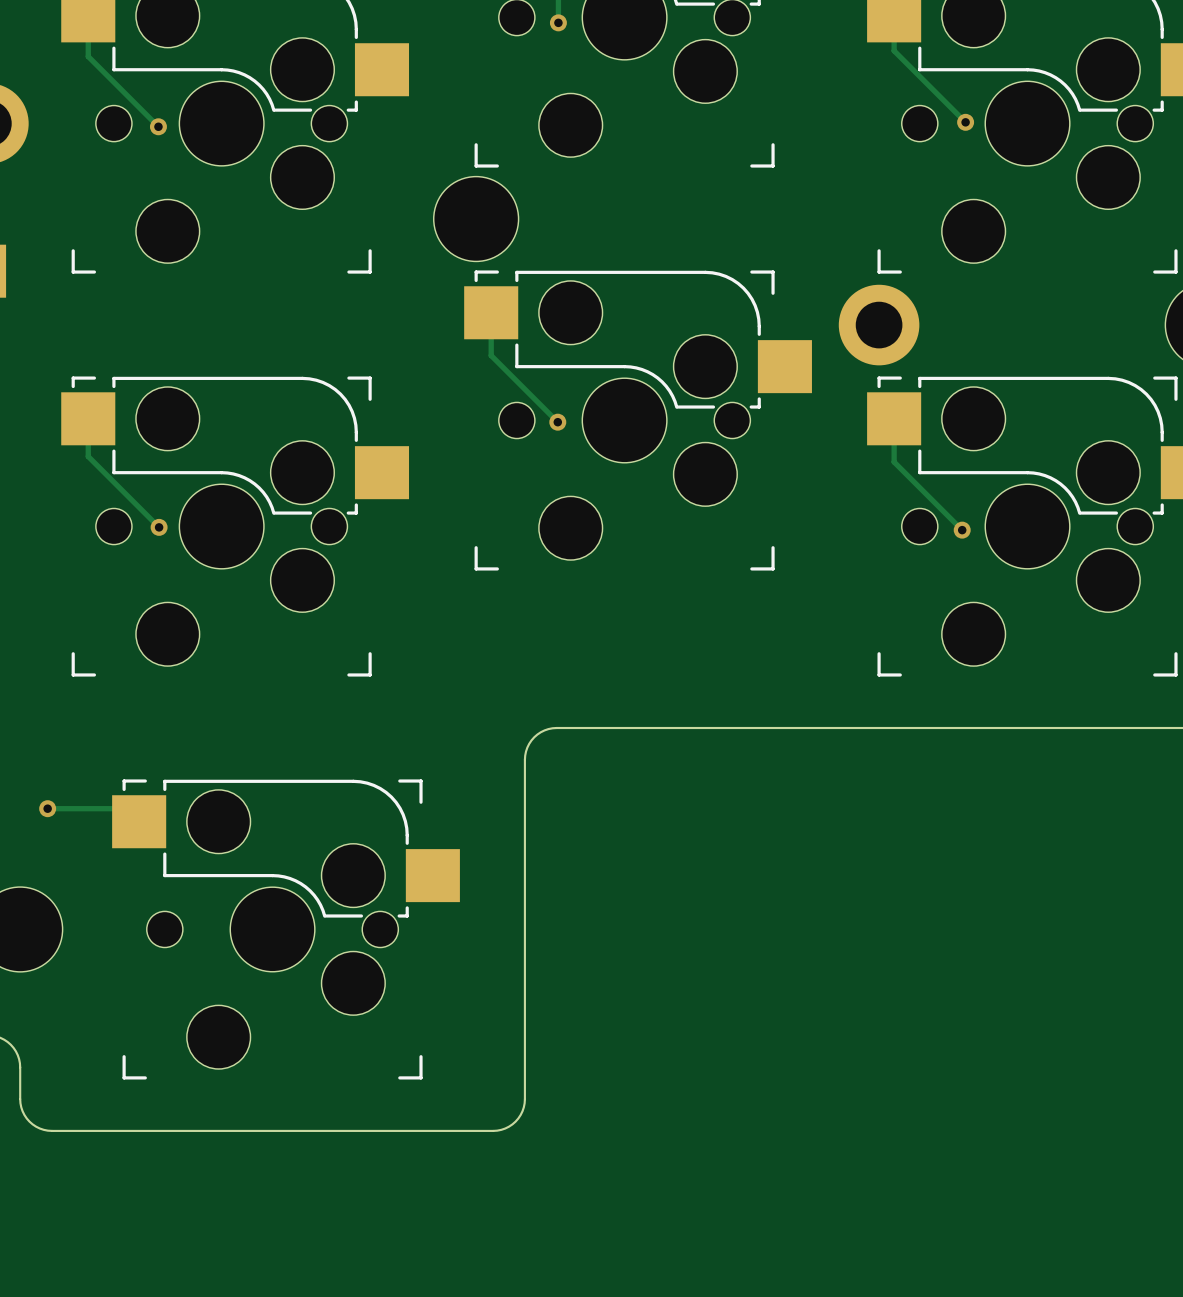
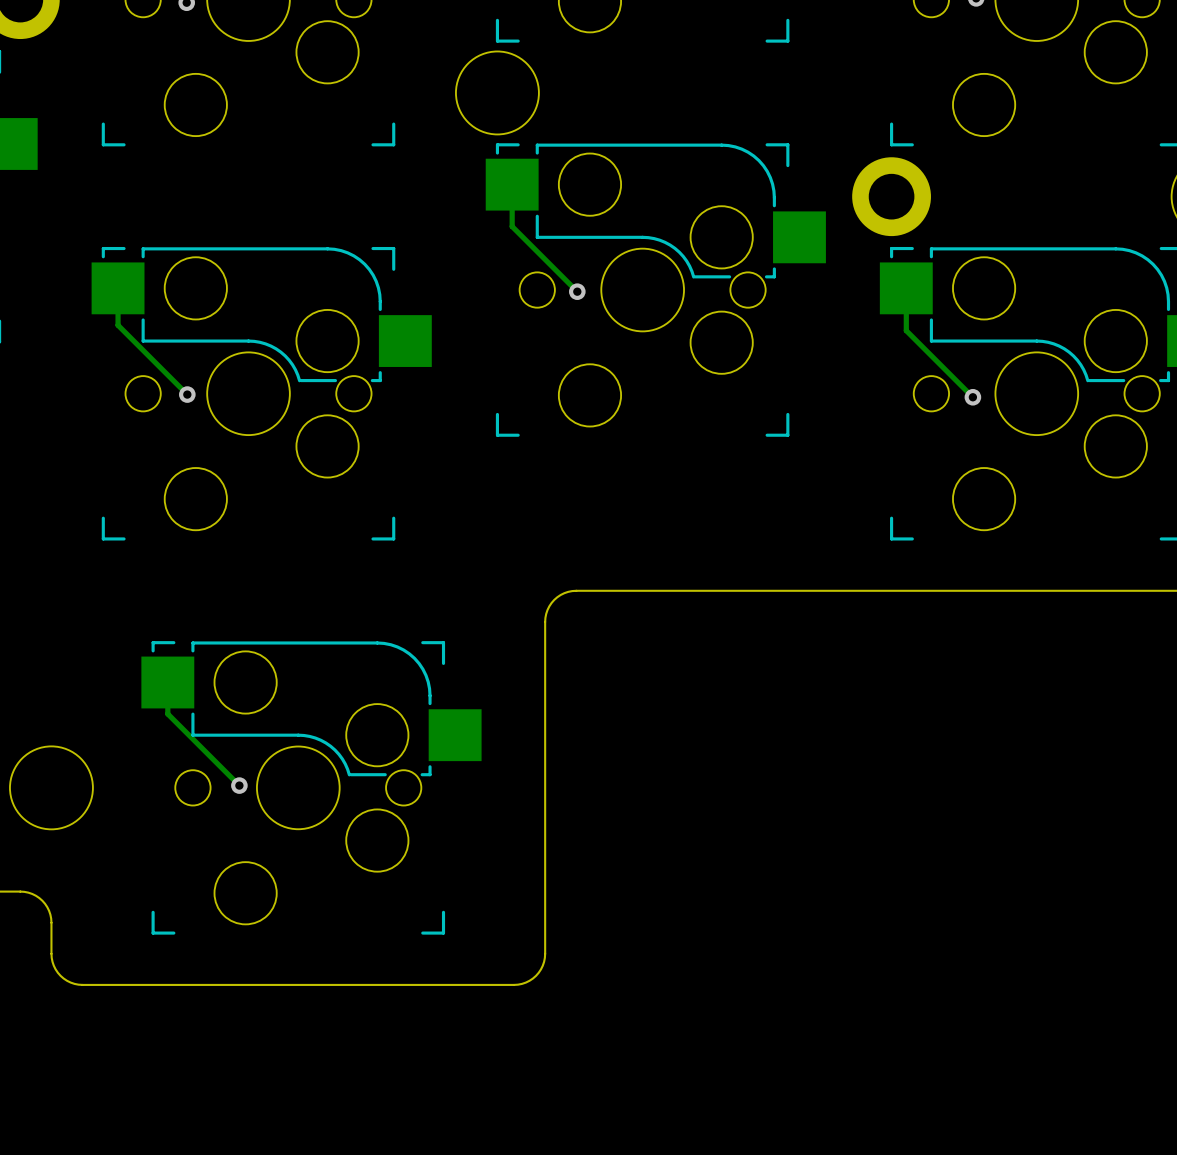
track: (47, 808) (126, 808) (139, 821) -> (239, 785) (167, 714) (167, 682)
via: (47, 808) -> none
via: none -> (239, 785)

